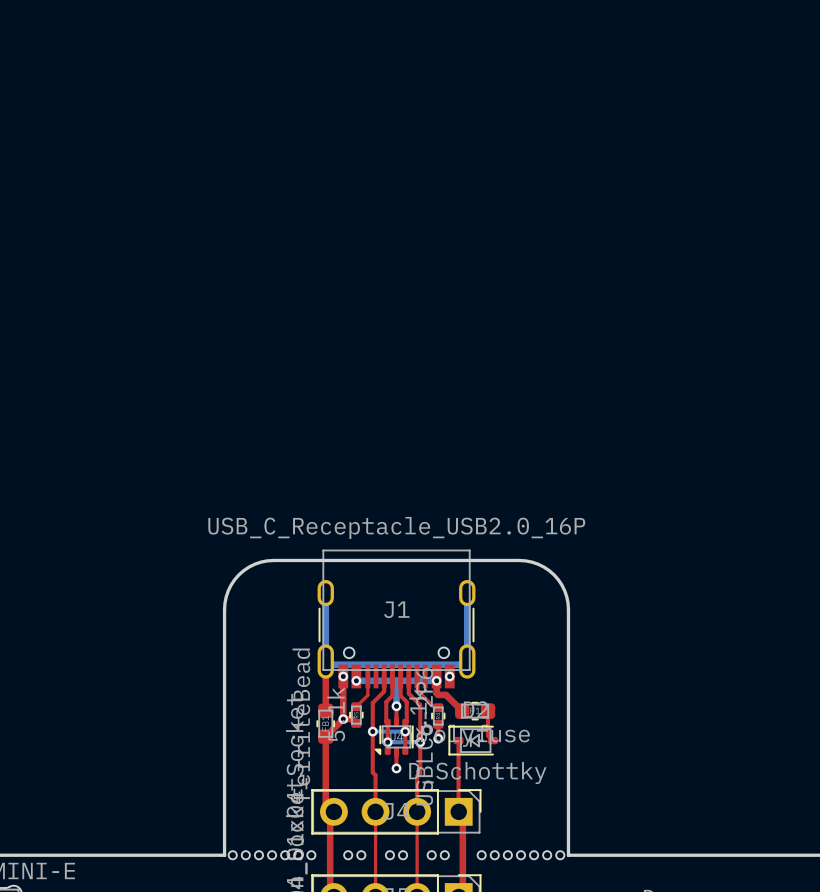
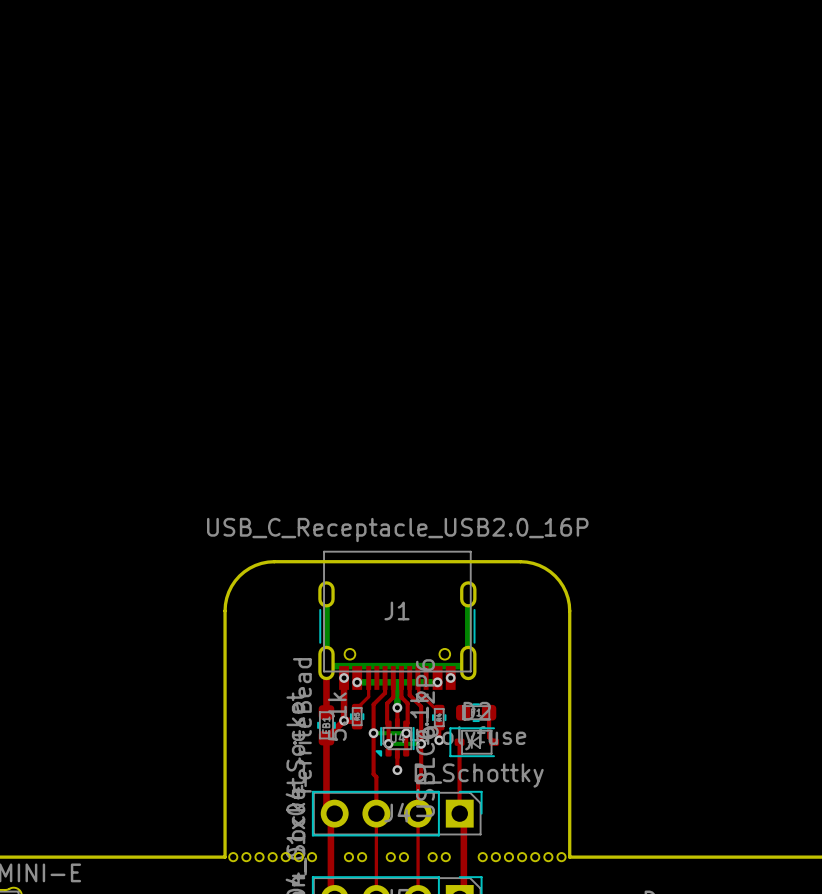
top track: (436, 680) (436, 693) (446, 694) (462, 711) -> none

